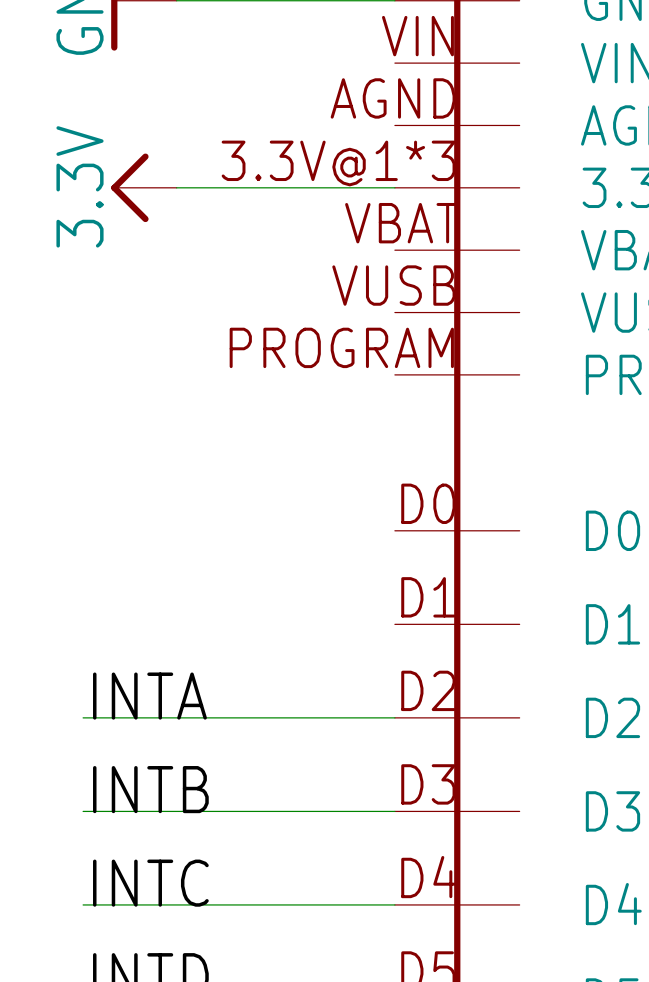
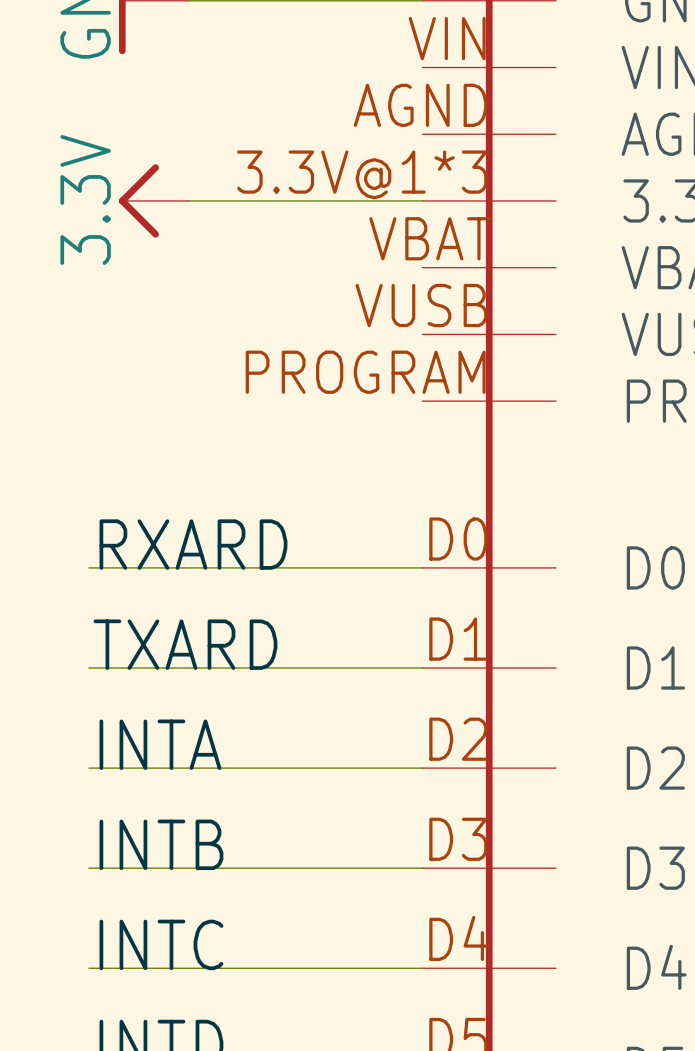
label: none -> RXARD (193, 544)
wire: none -> (88, 567) (422, 567)
label: none -> TXARD (185, 644)
wire: none -> (88, 668) (422, 668)

